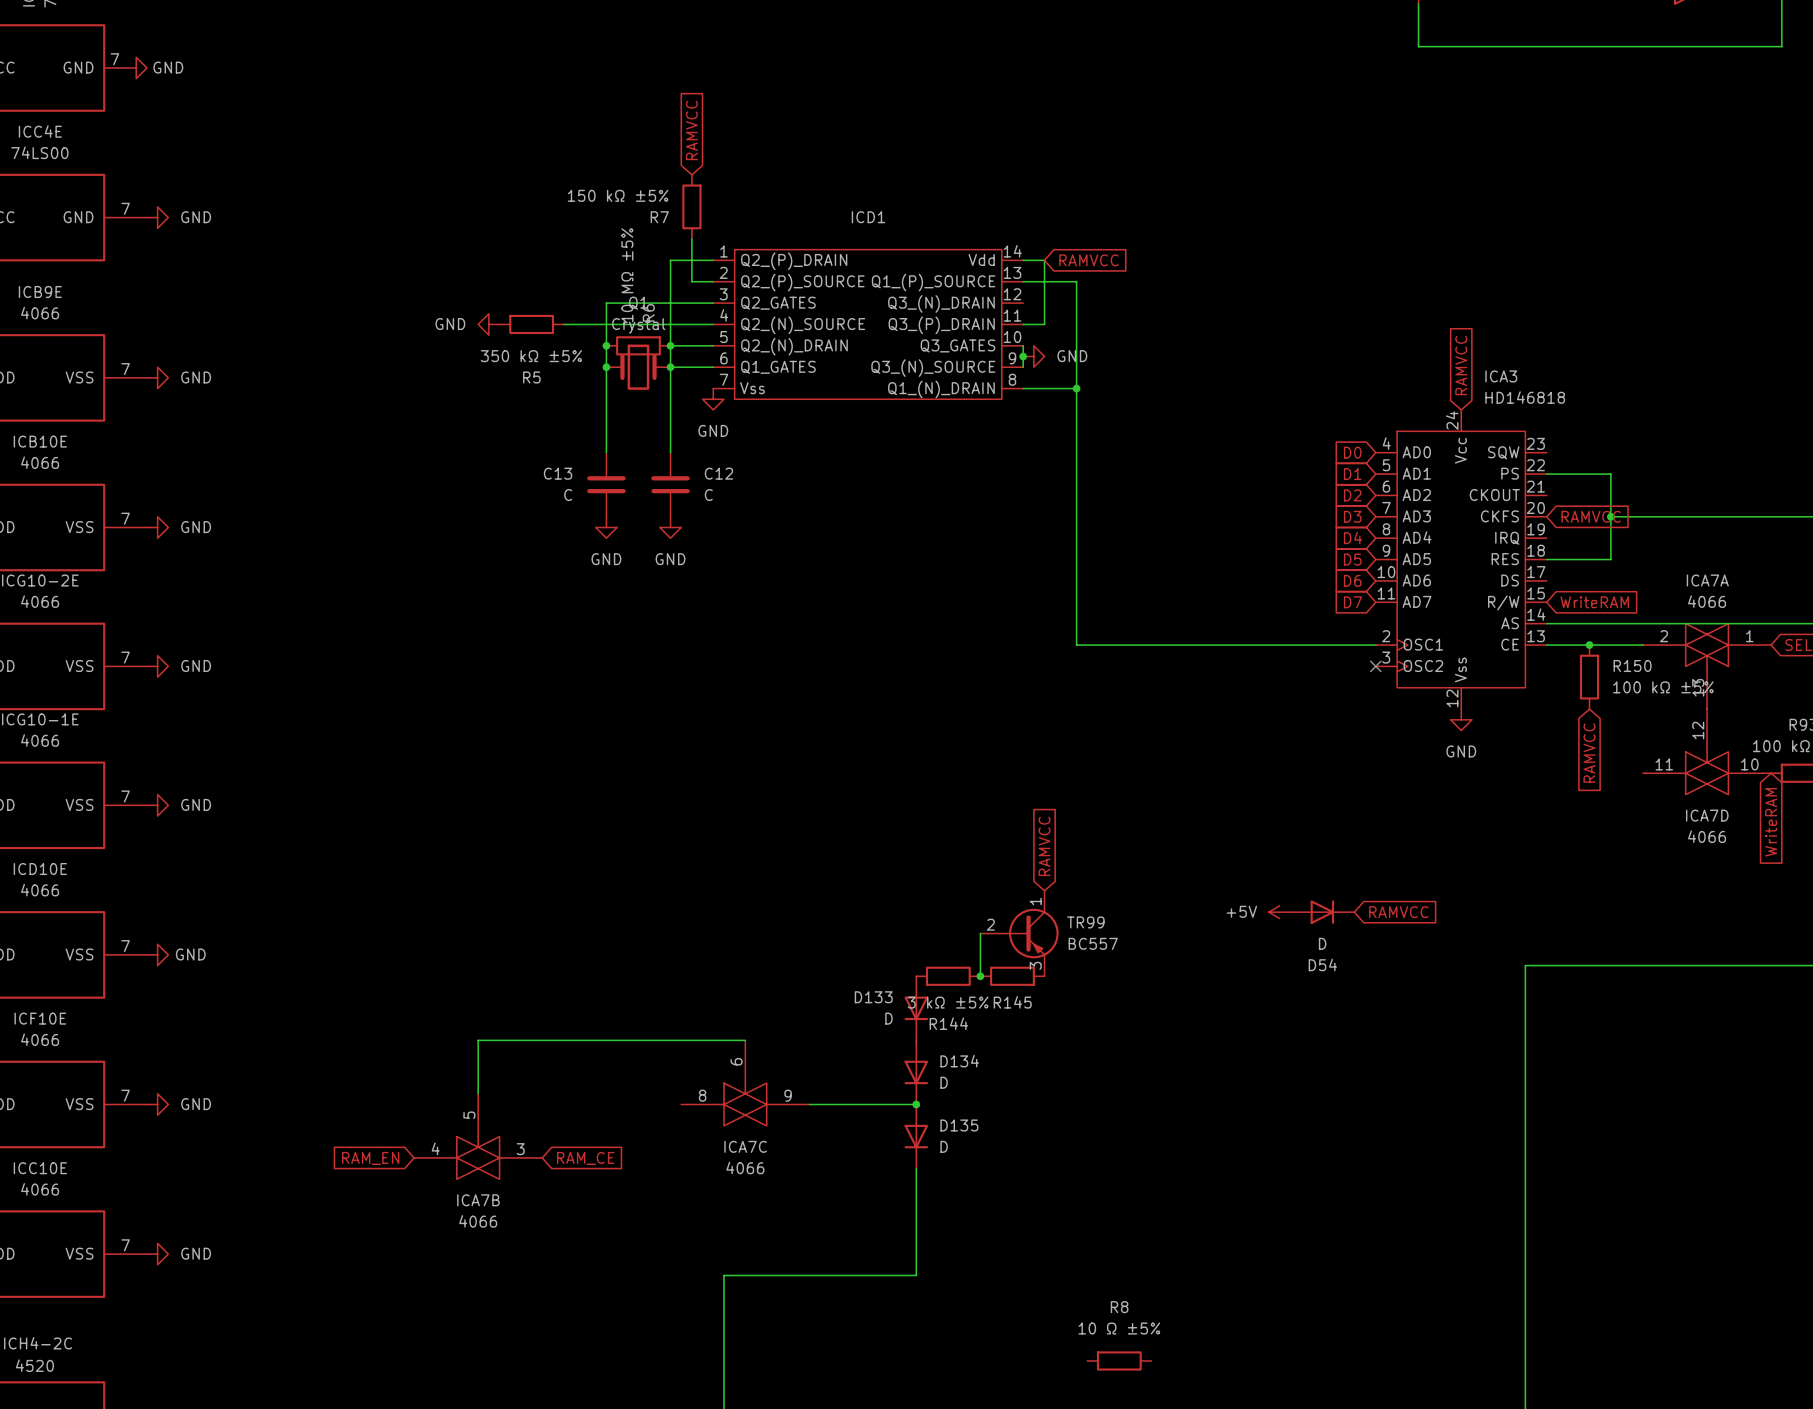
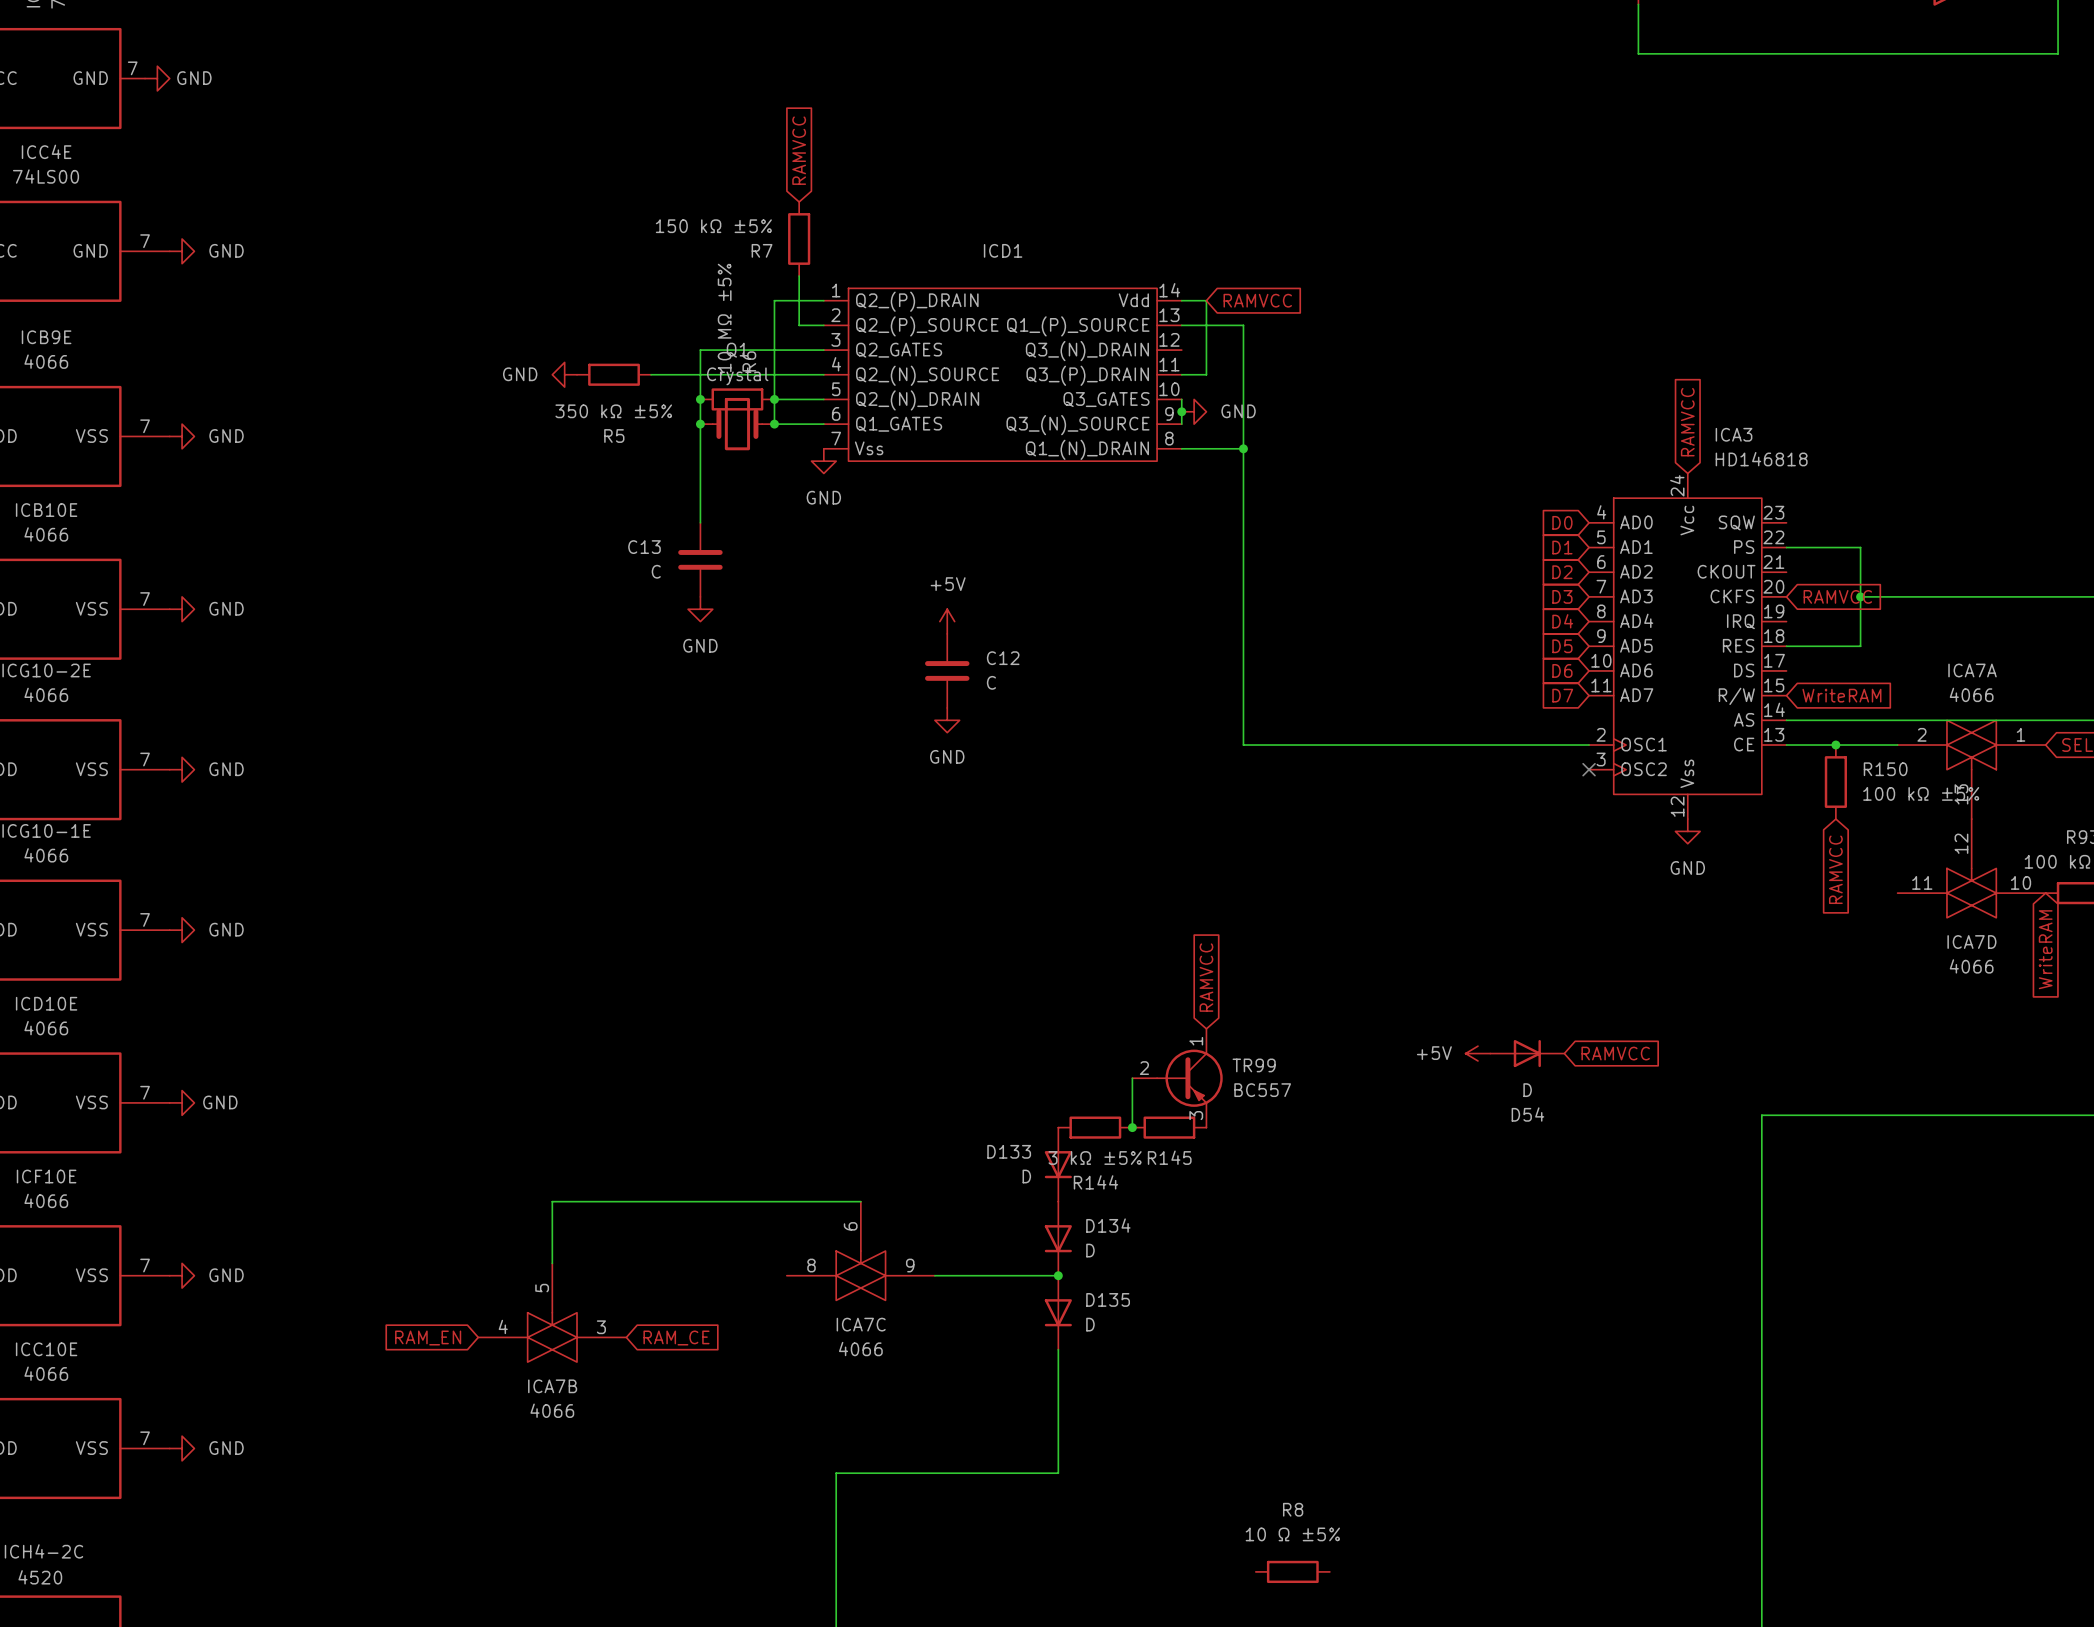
wire: (670, 367) (670, 452) -> none
C12 position: (670, 484) -> (947, 670)
power symbol position: GND (670, 527) -> GND (947, 720)
power symbol: none -> +5V (947, 621)

